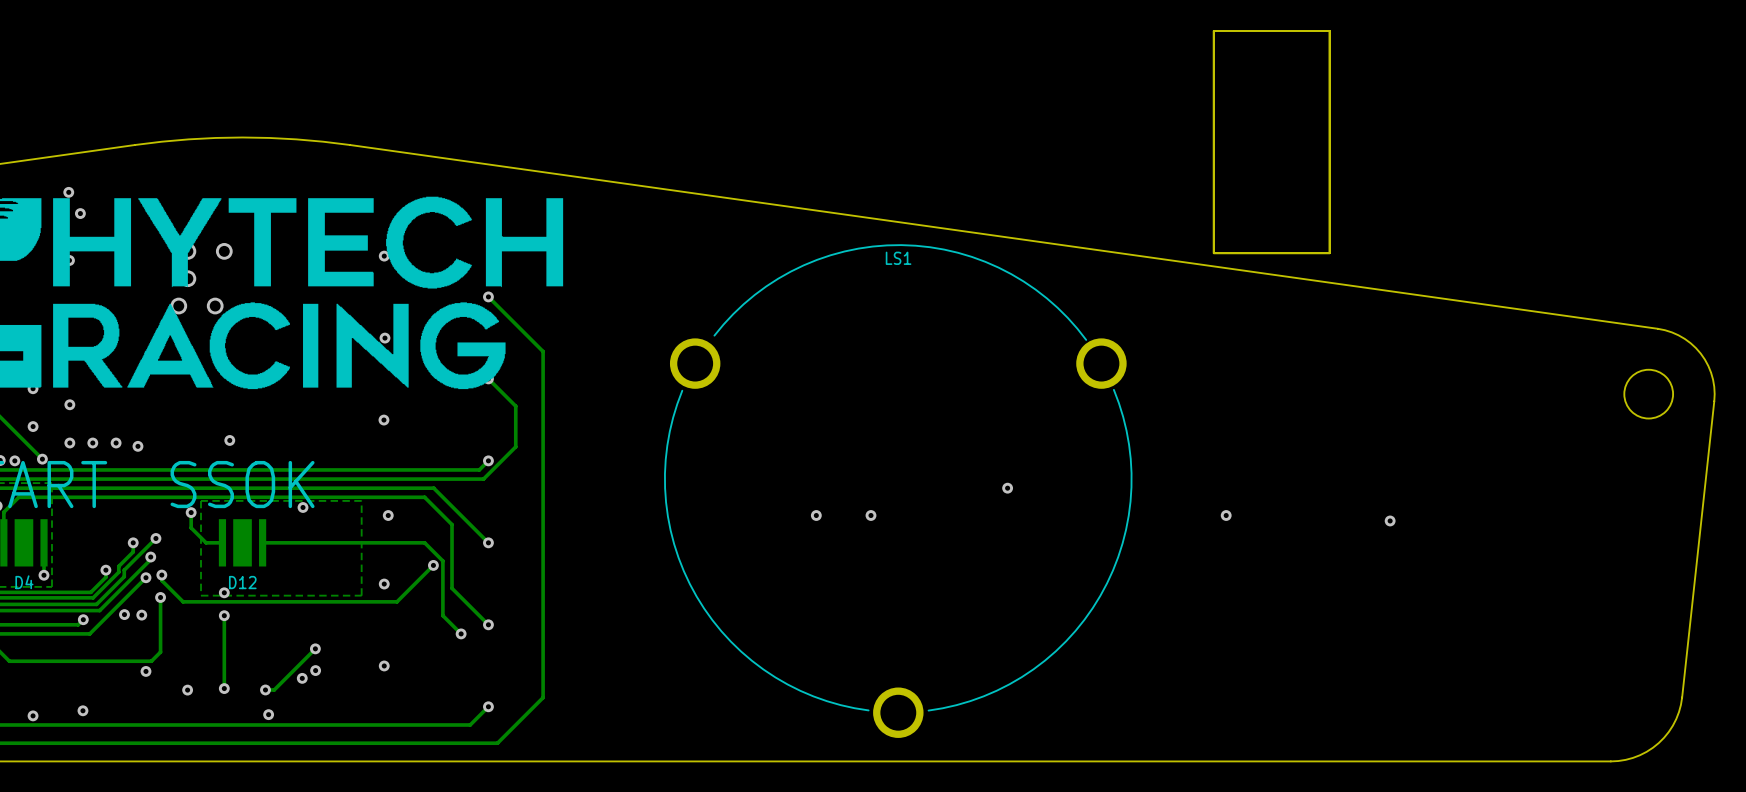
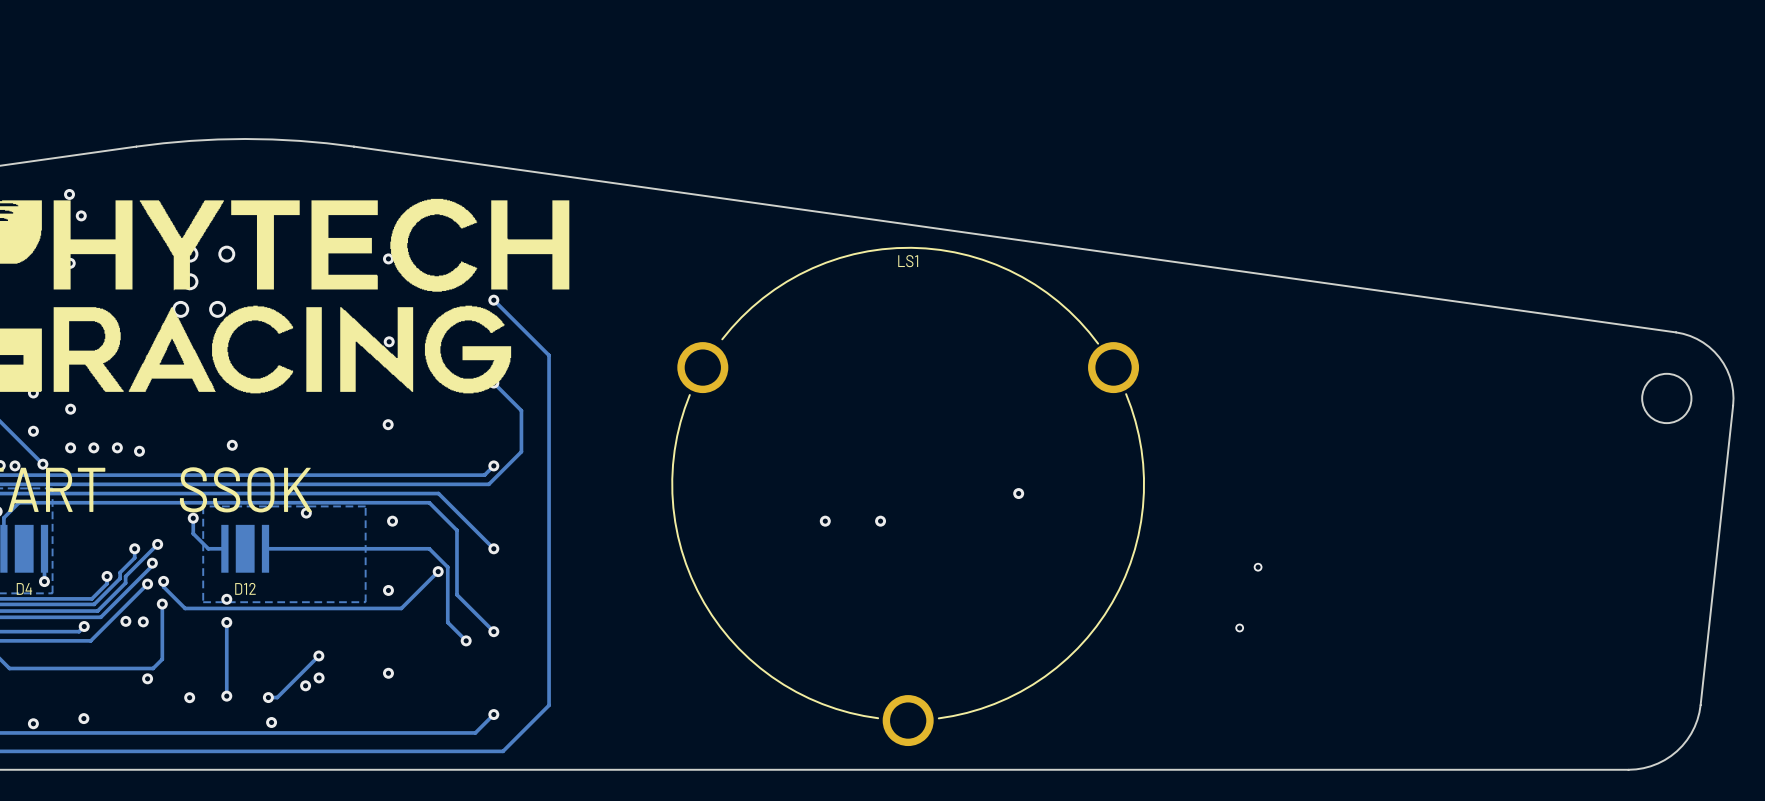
part: (1271, 142) -> none
via: (1226, 515) -> none
via: (1390, 520) -> none
via: none -> (1258, 567)
via: none -> (1239, 627)

